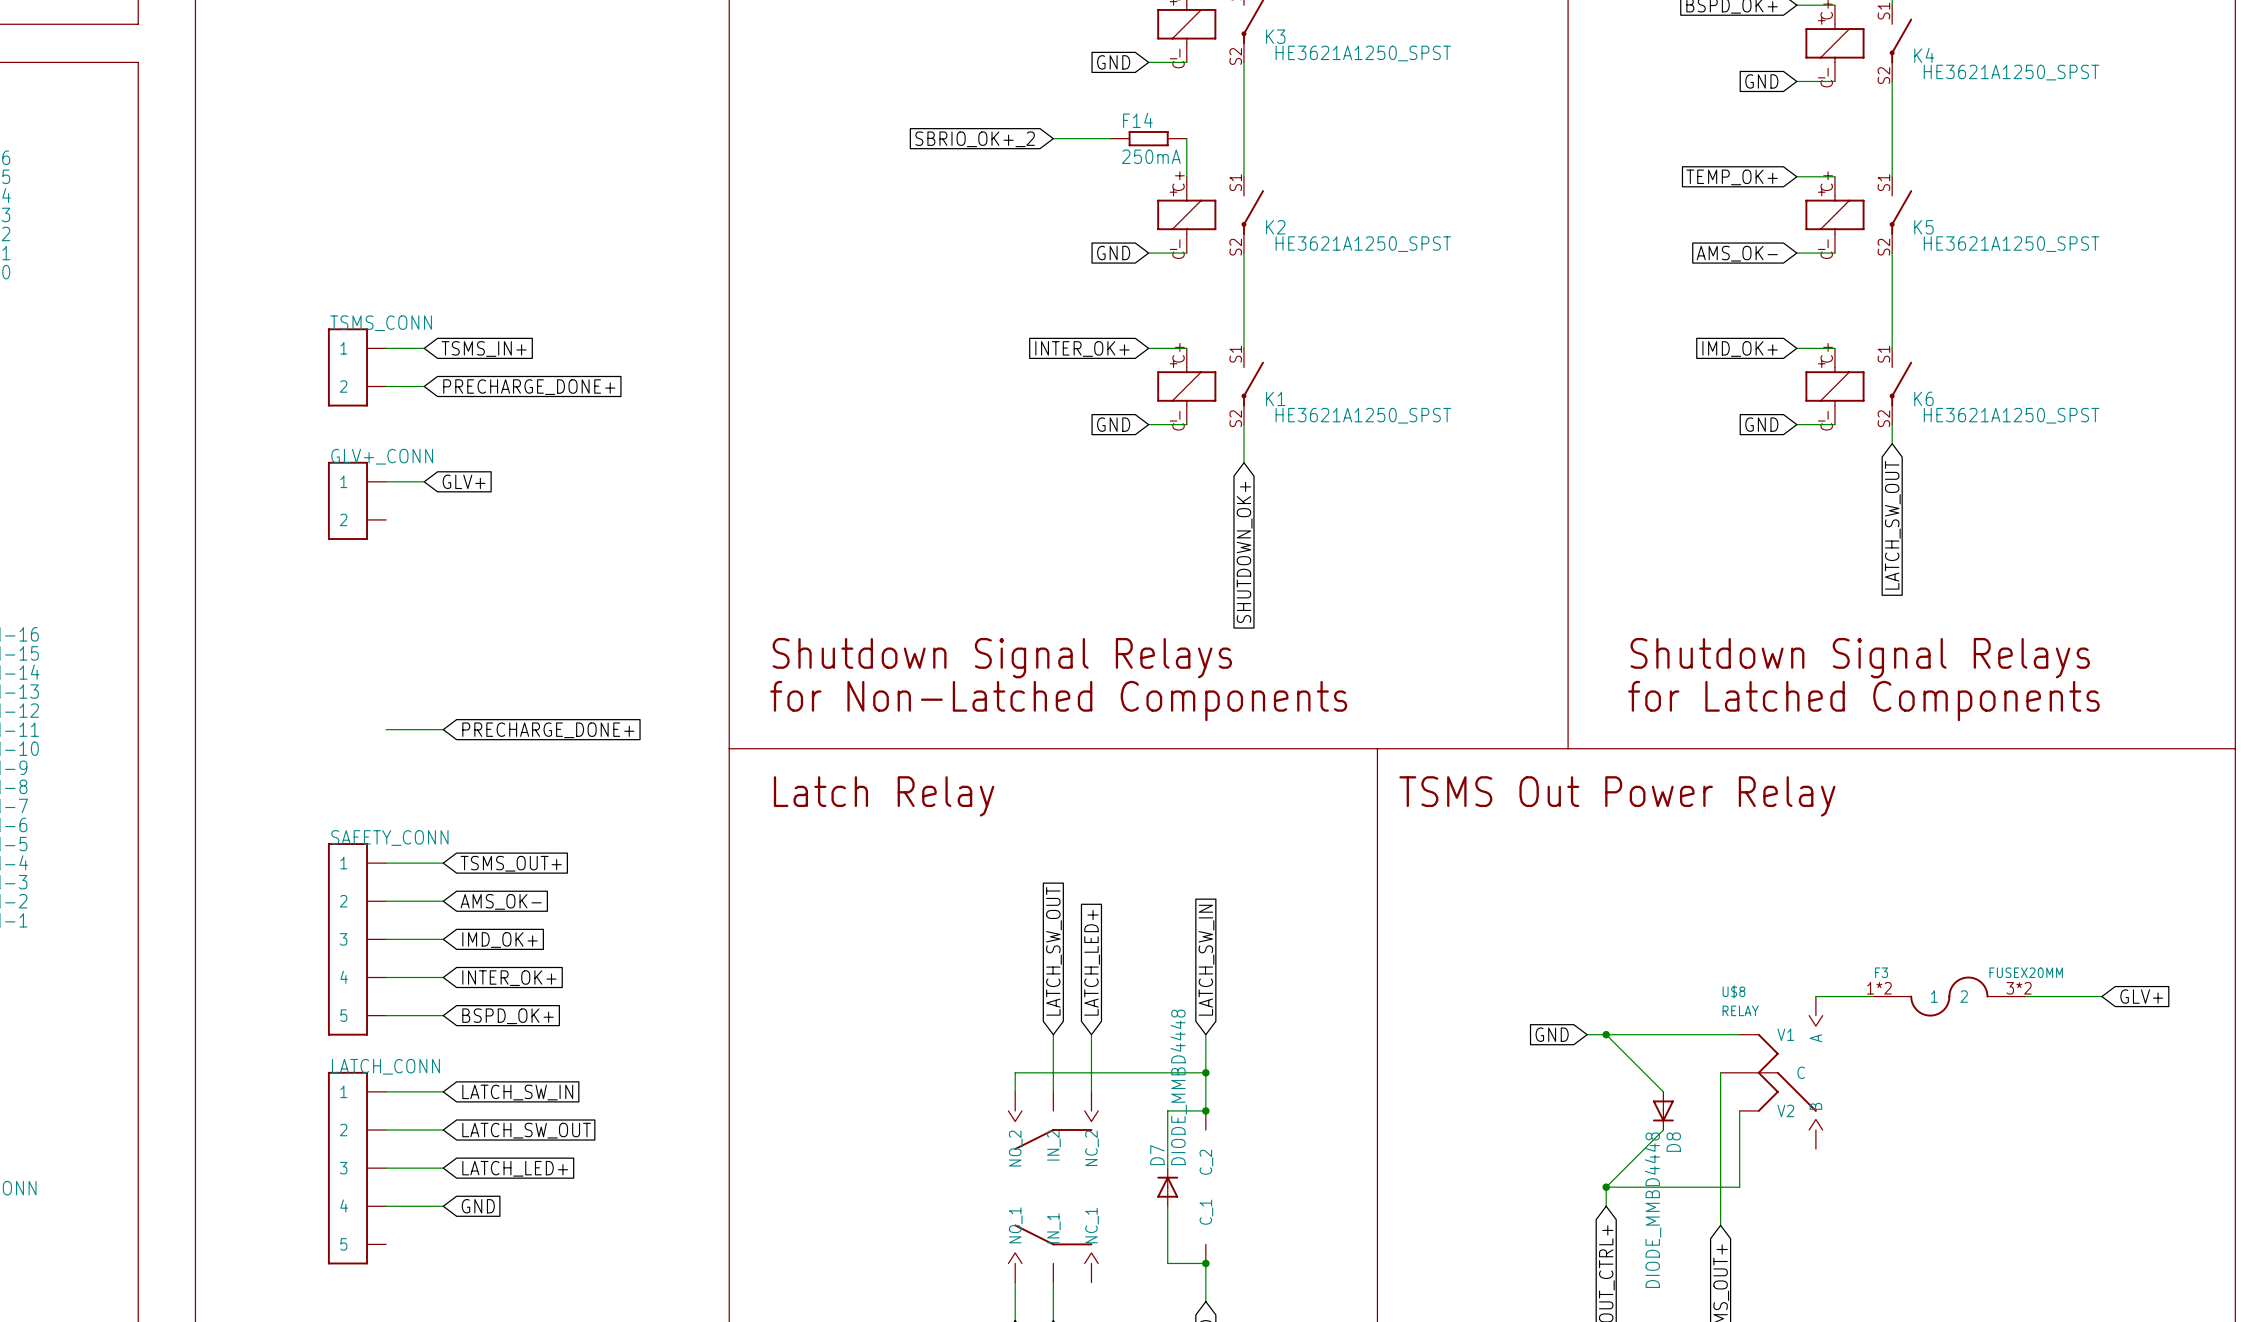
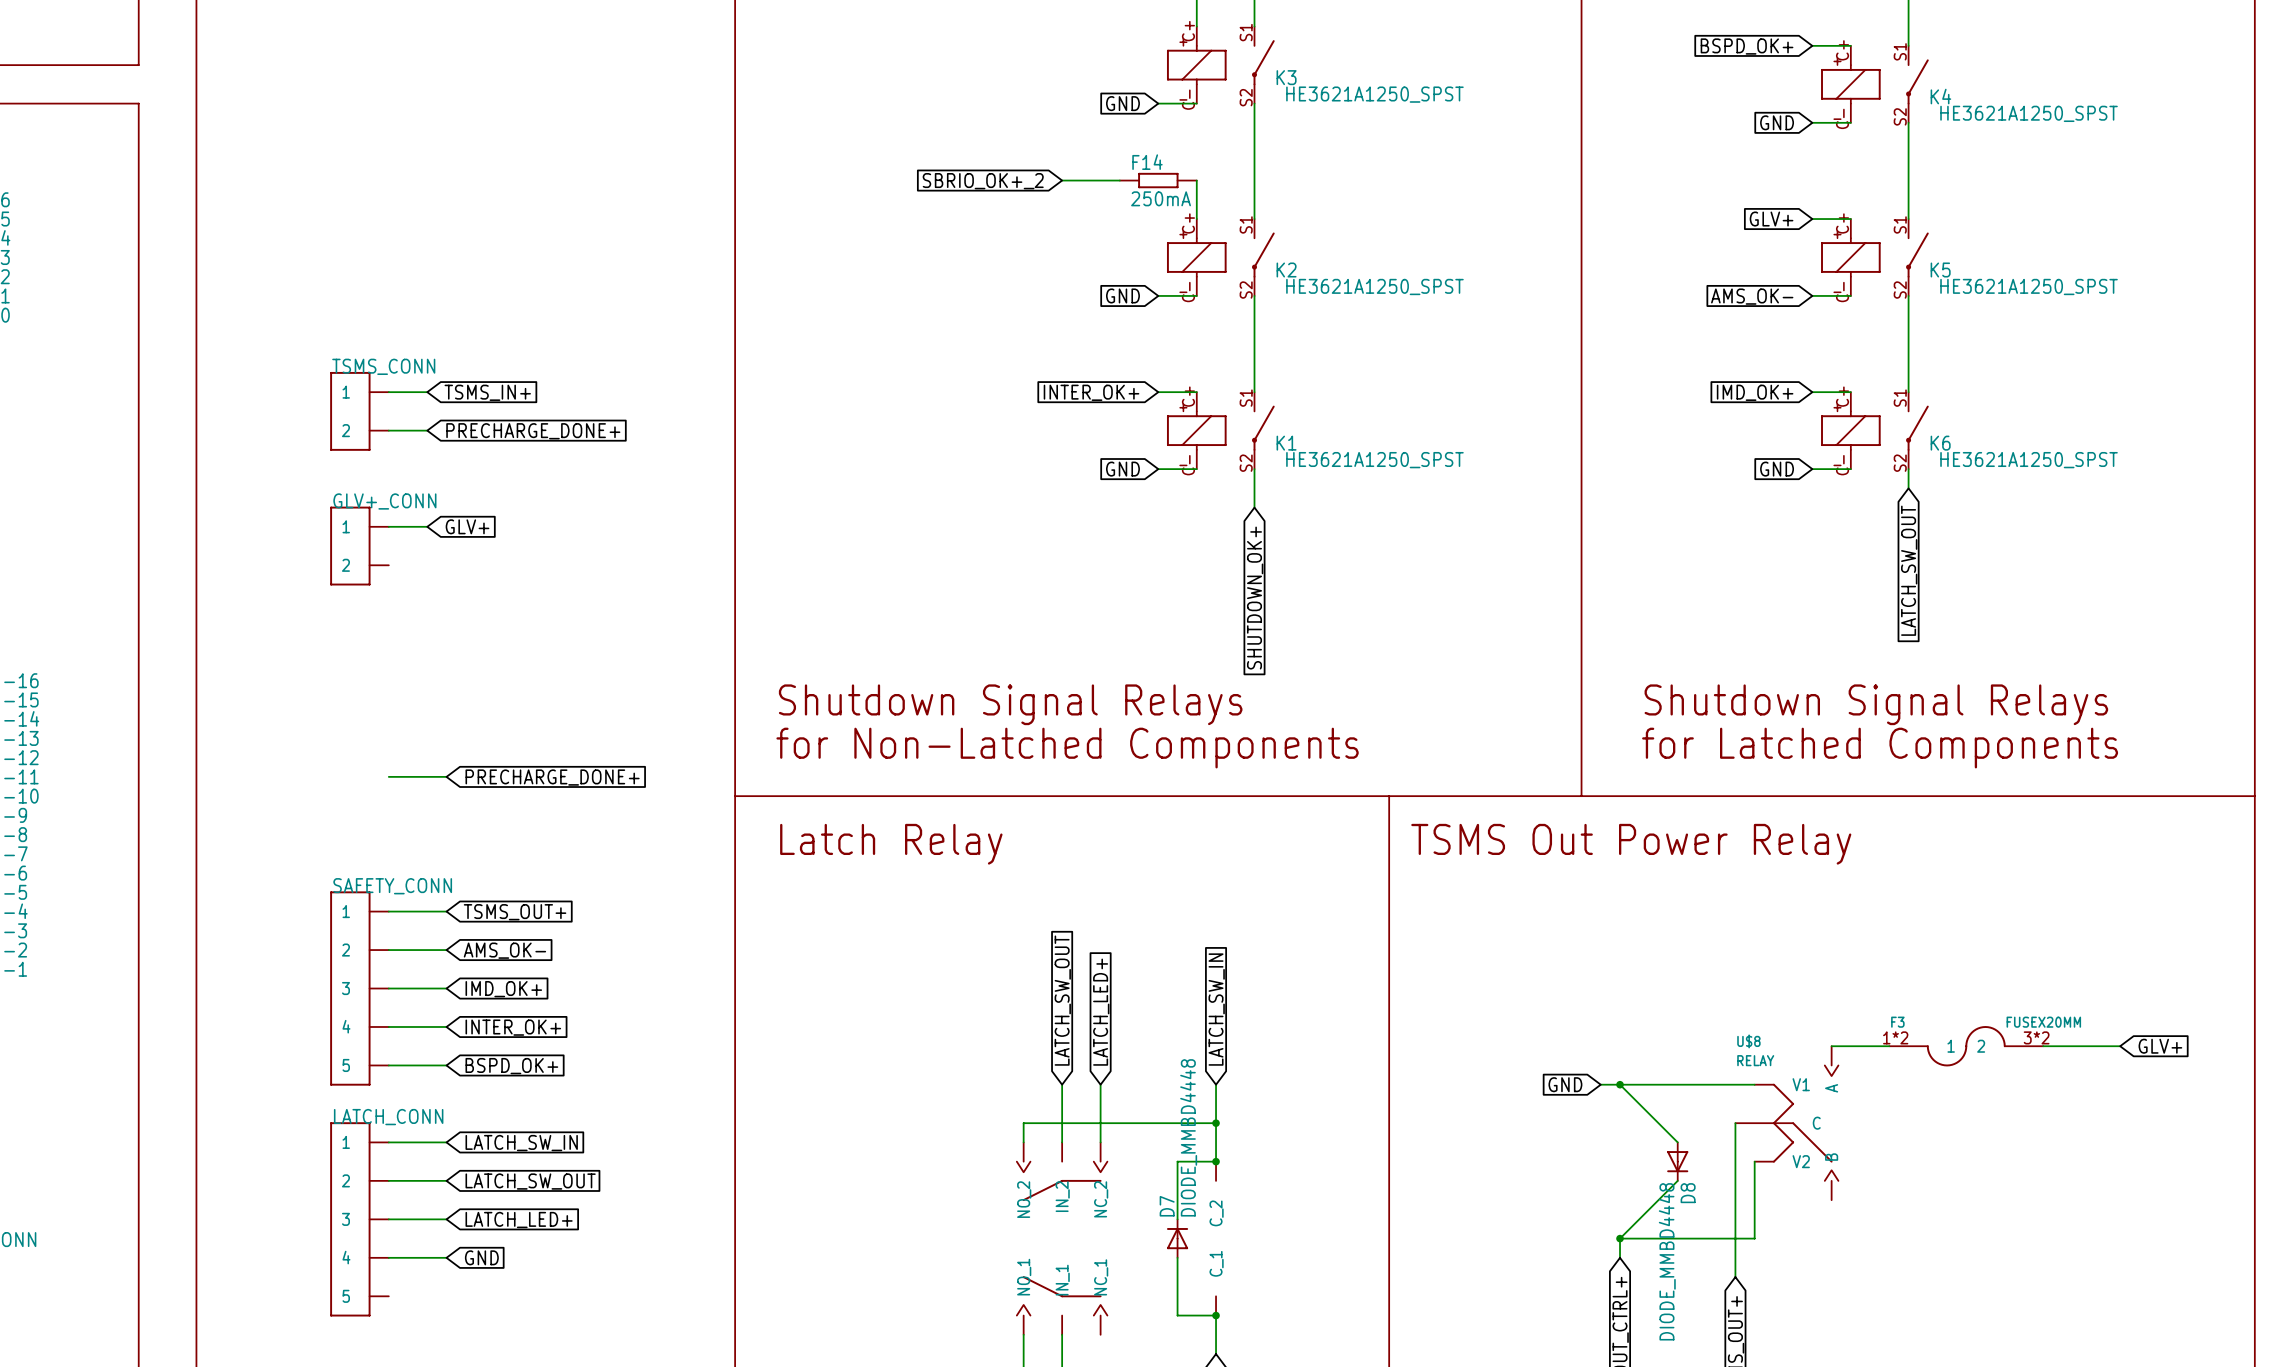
global label: TEMP_OK+ (1732, 177) -> GLV+ (1771, 219)

